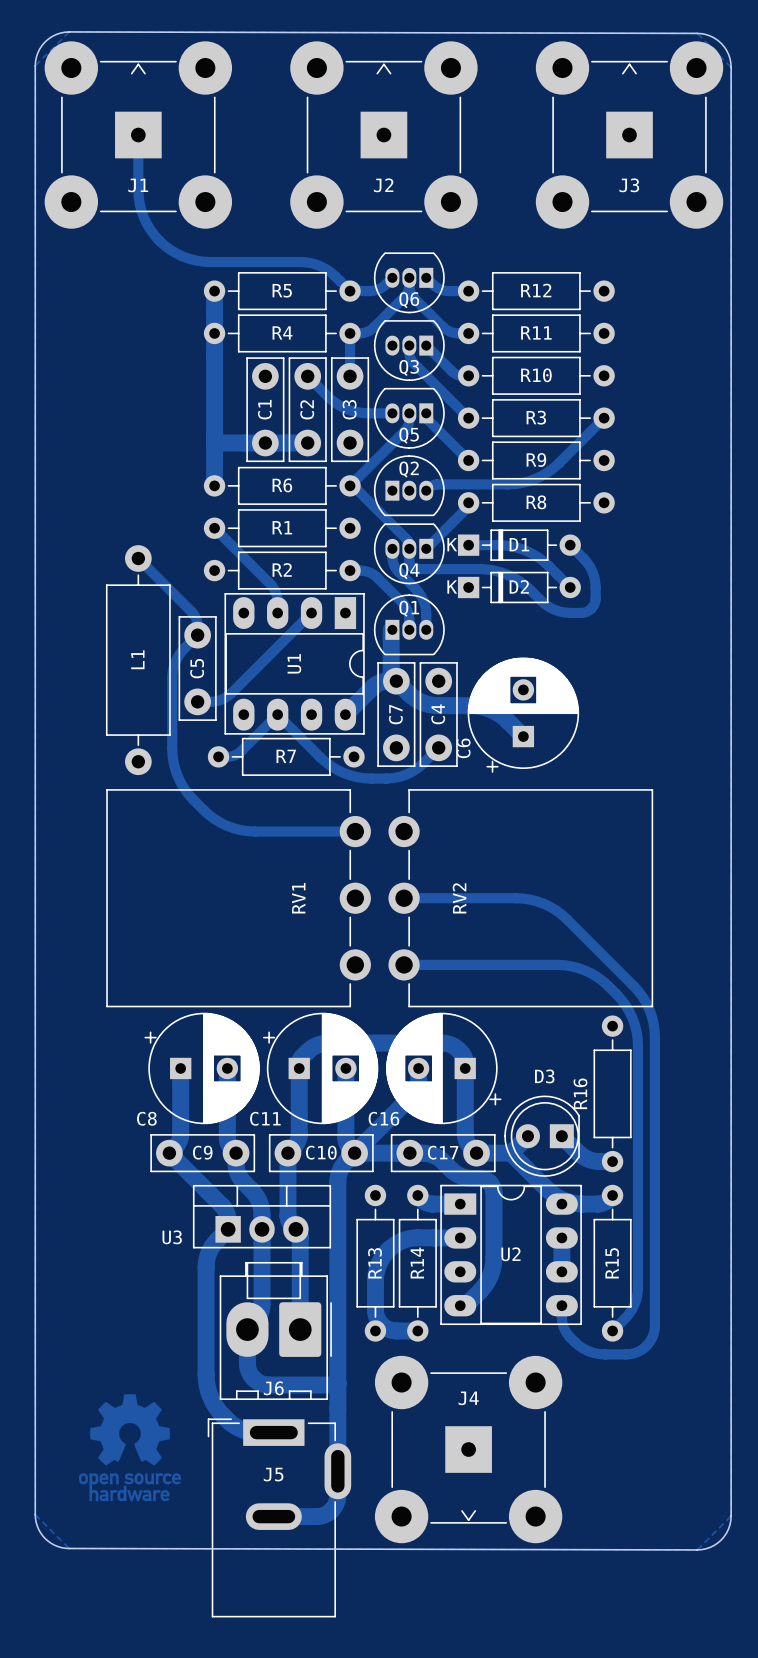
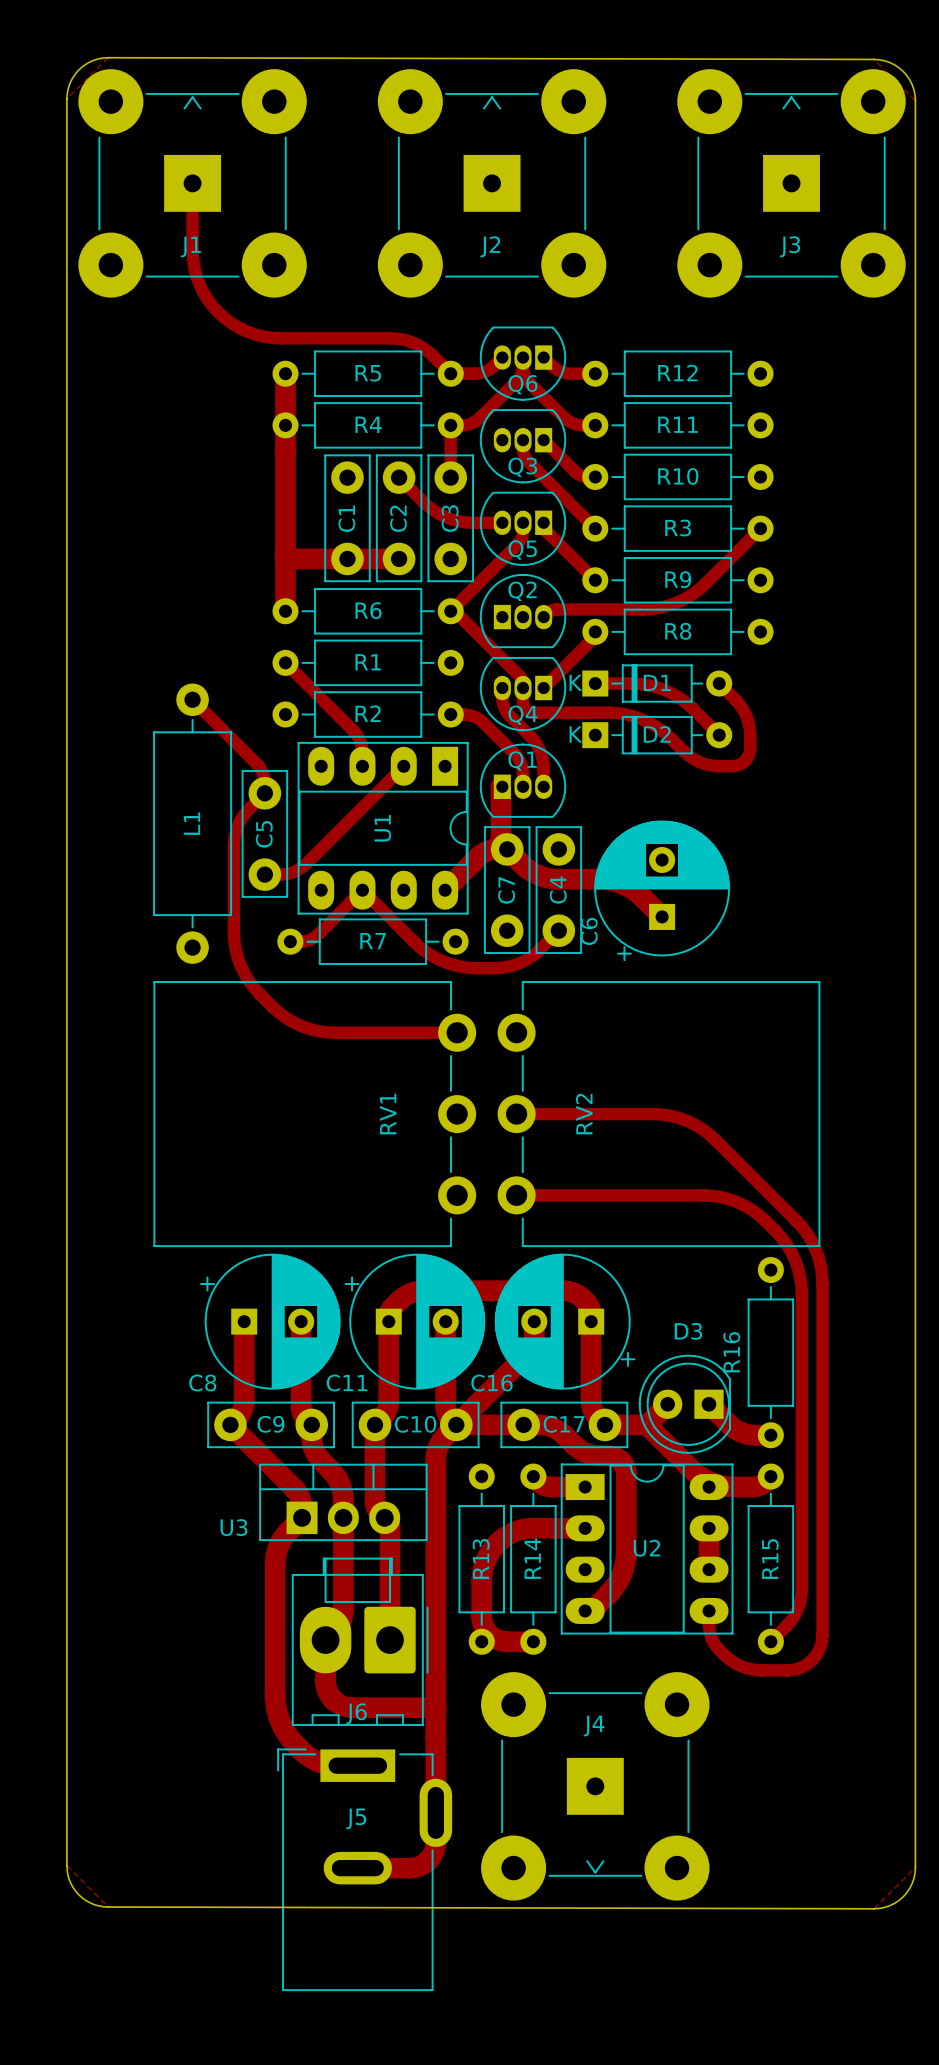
drawing: [79, 1394, 181, 1502] -> none

